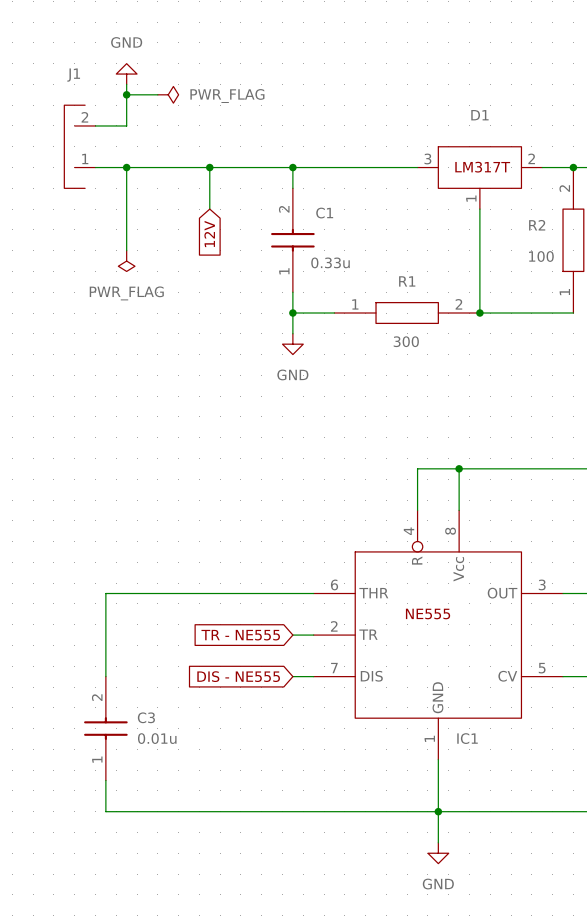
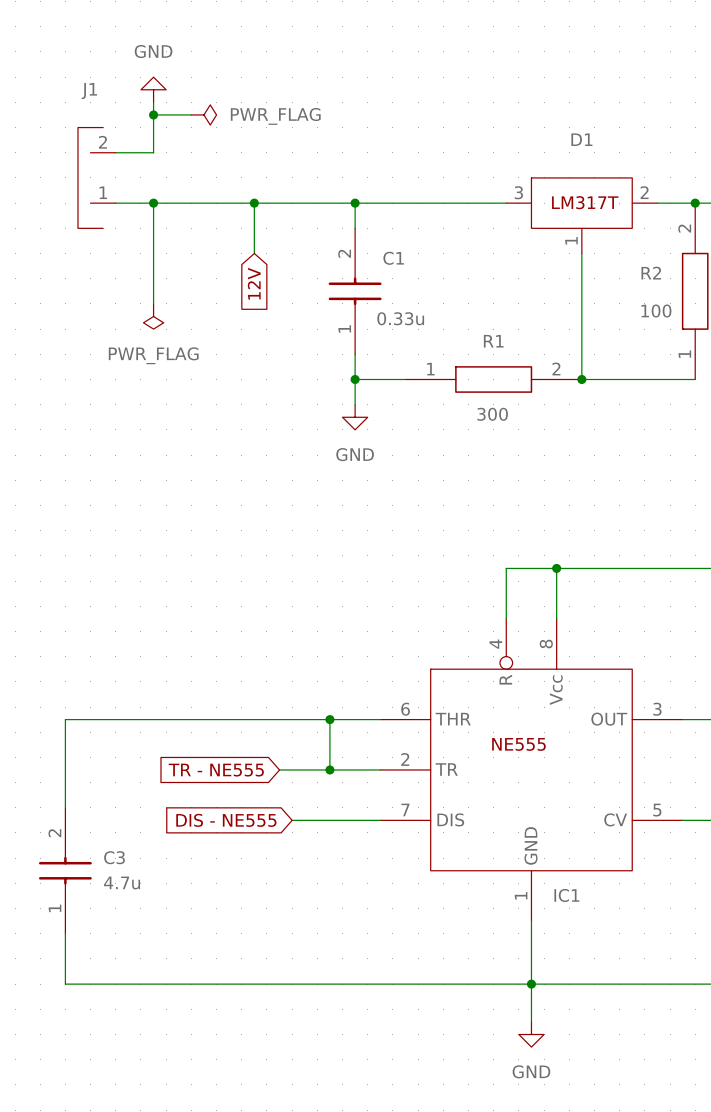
wire: (105, 593) (105, 676) -> (128, 719) (65, 719) (65, 807)
wire: none -> (329, 719) (329, 769)
junction: none -> (329, 719)
wire: none -> (279, 769) (355, 769)
global label position: TR - NE555 (240, 635) -> TR - NE555 (216, 770)
junction: none -> (329, 769)
global label position: DIS - NE555 (238, 676) -> DIS - NE555 (226, 820)
wire: none -> (292, 820) (355, 820)
C3 position: (105, 728) -> (65, 870)
C3 value: 0.01u (157, 738) -> 4.7u (122, 883)
wire: (105, 780) (105, 811) -> (65, 933) (65, 984) (128, 984)

